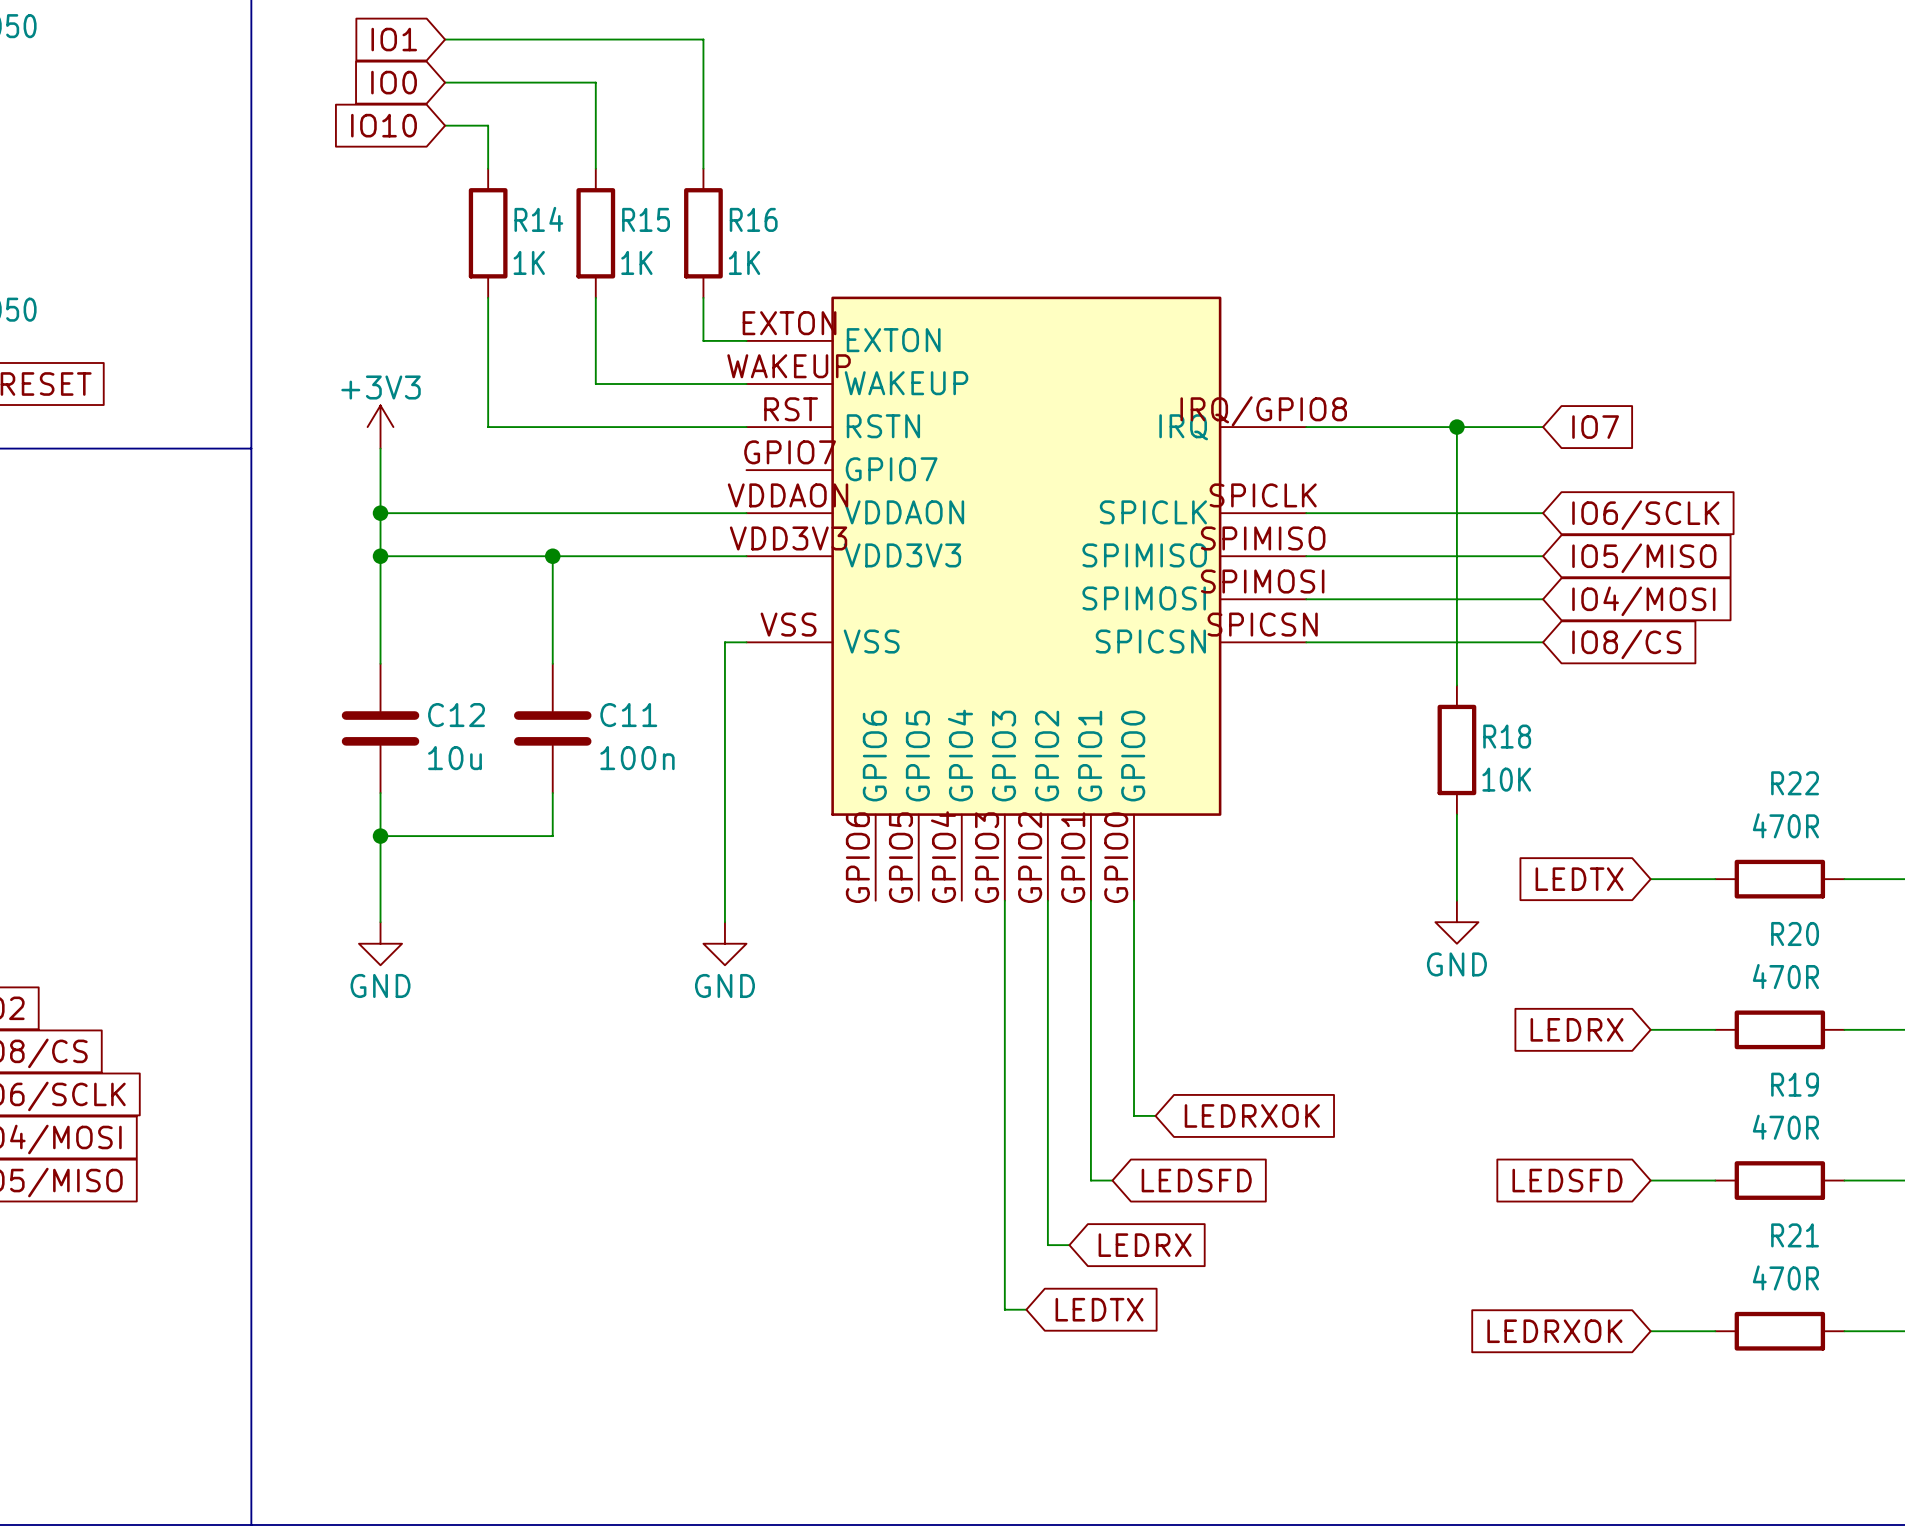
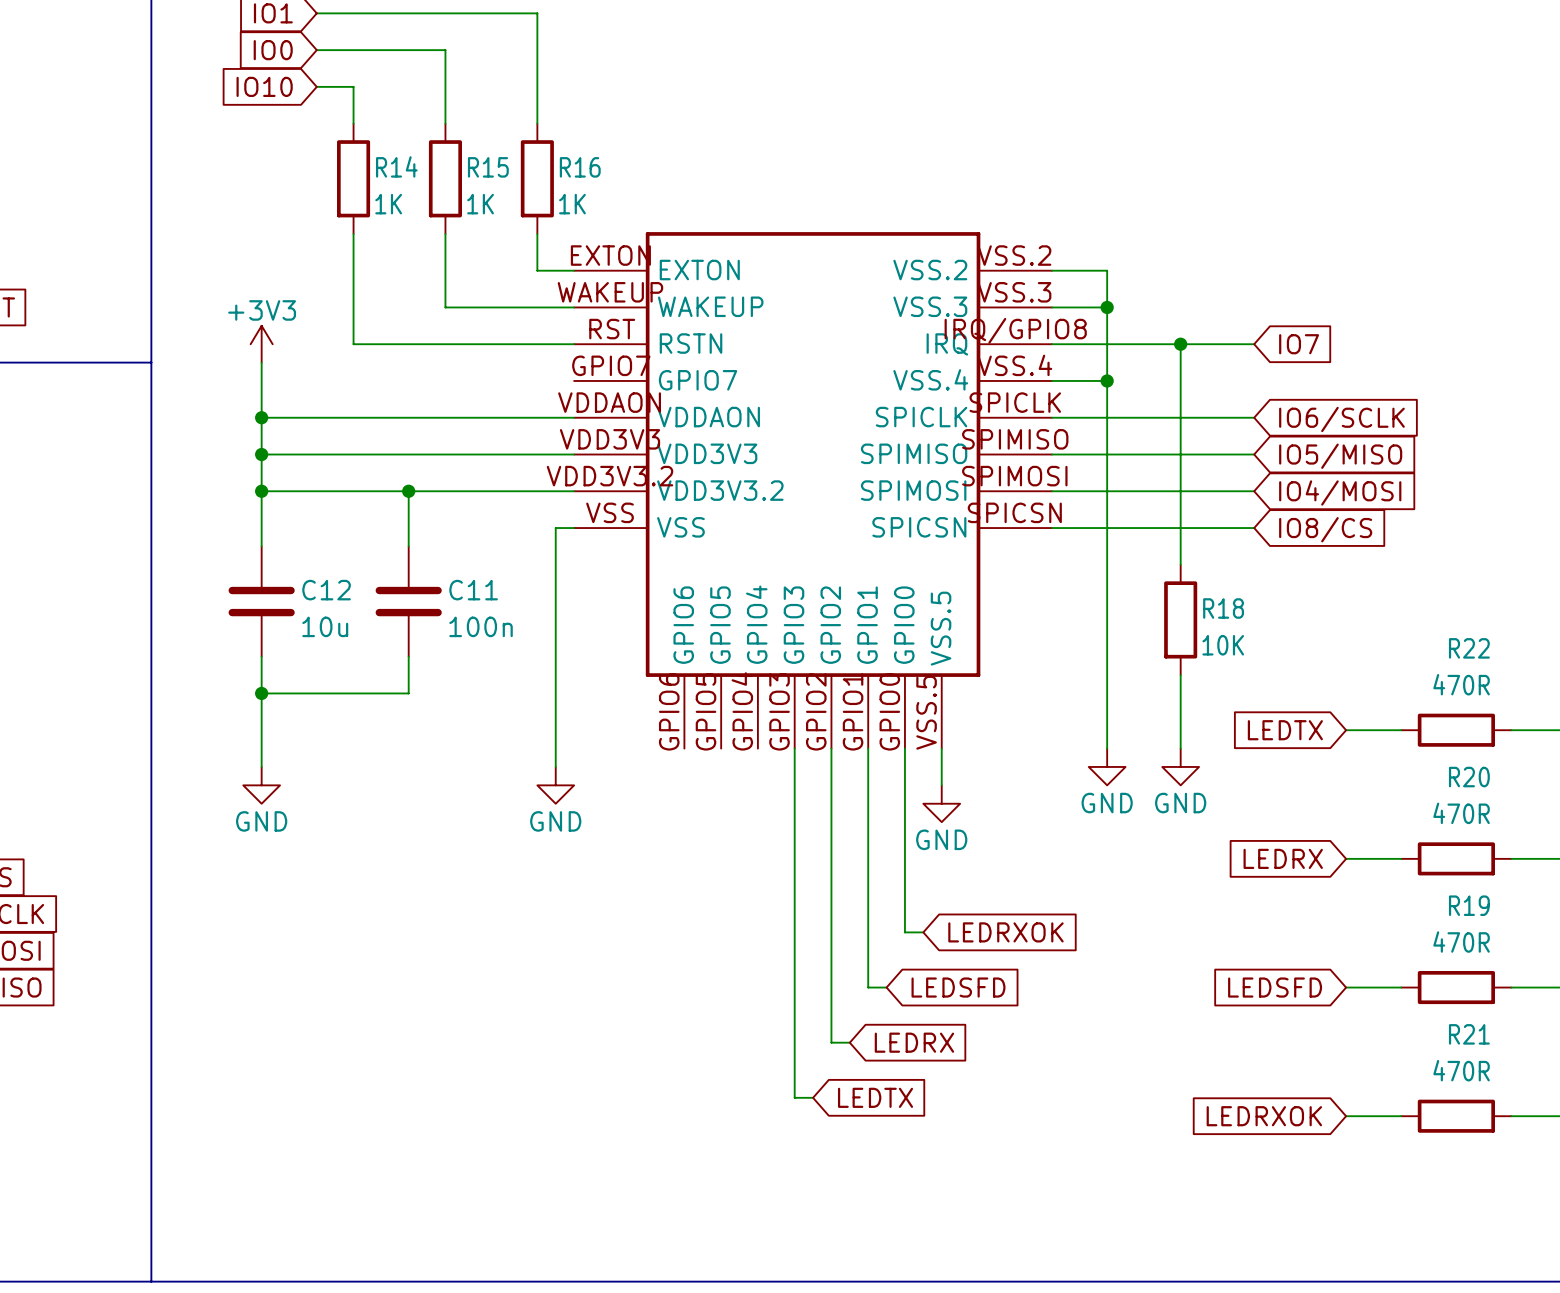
part symbol: [746, 296, 1307, 901] -> [574, 232, 1053, 749]
wire: none -> (1052, 270) (1107, 270) (1107, 748)
wire: none -> (1052, 307) (1107, 307)
junction: none -> (1107, 307)
wire: none -> (1052, 380) (1107, 380)
junction: none -> (1107, 380)
wire: (552, 556) (552, 599) -> none
junction position: (552, 556) -> (408, 491)
wire: none -> (261, 491) (574, 491)
junction: none -> (261, 491)
wire: none -> (941, 748) (941, 785)
power symbol: none -> GND (1107, 766)
power symbol: none -> GND (941, 803)

